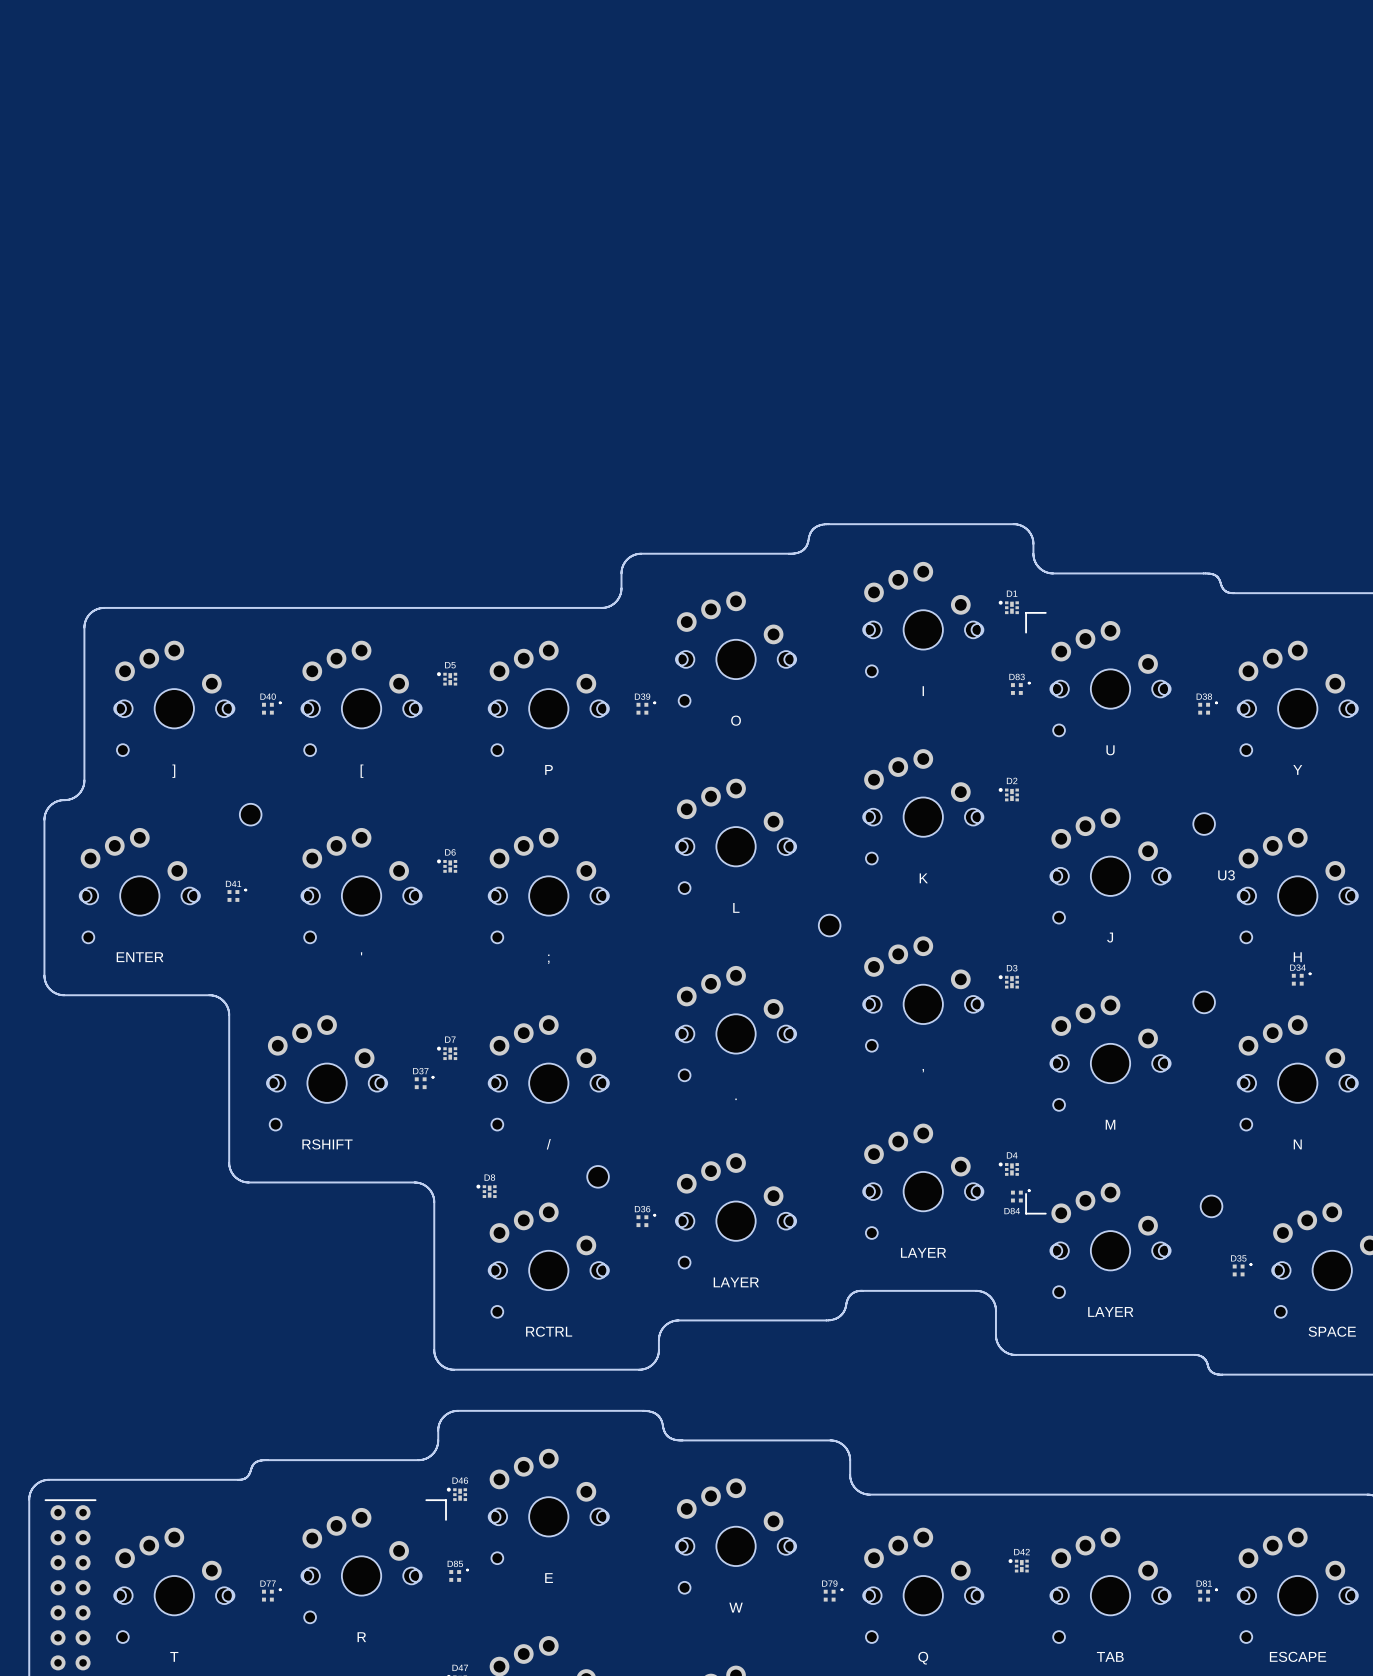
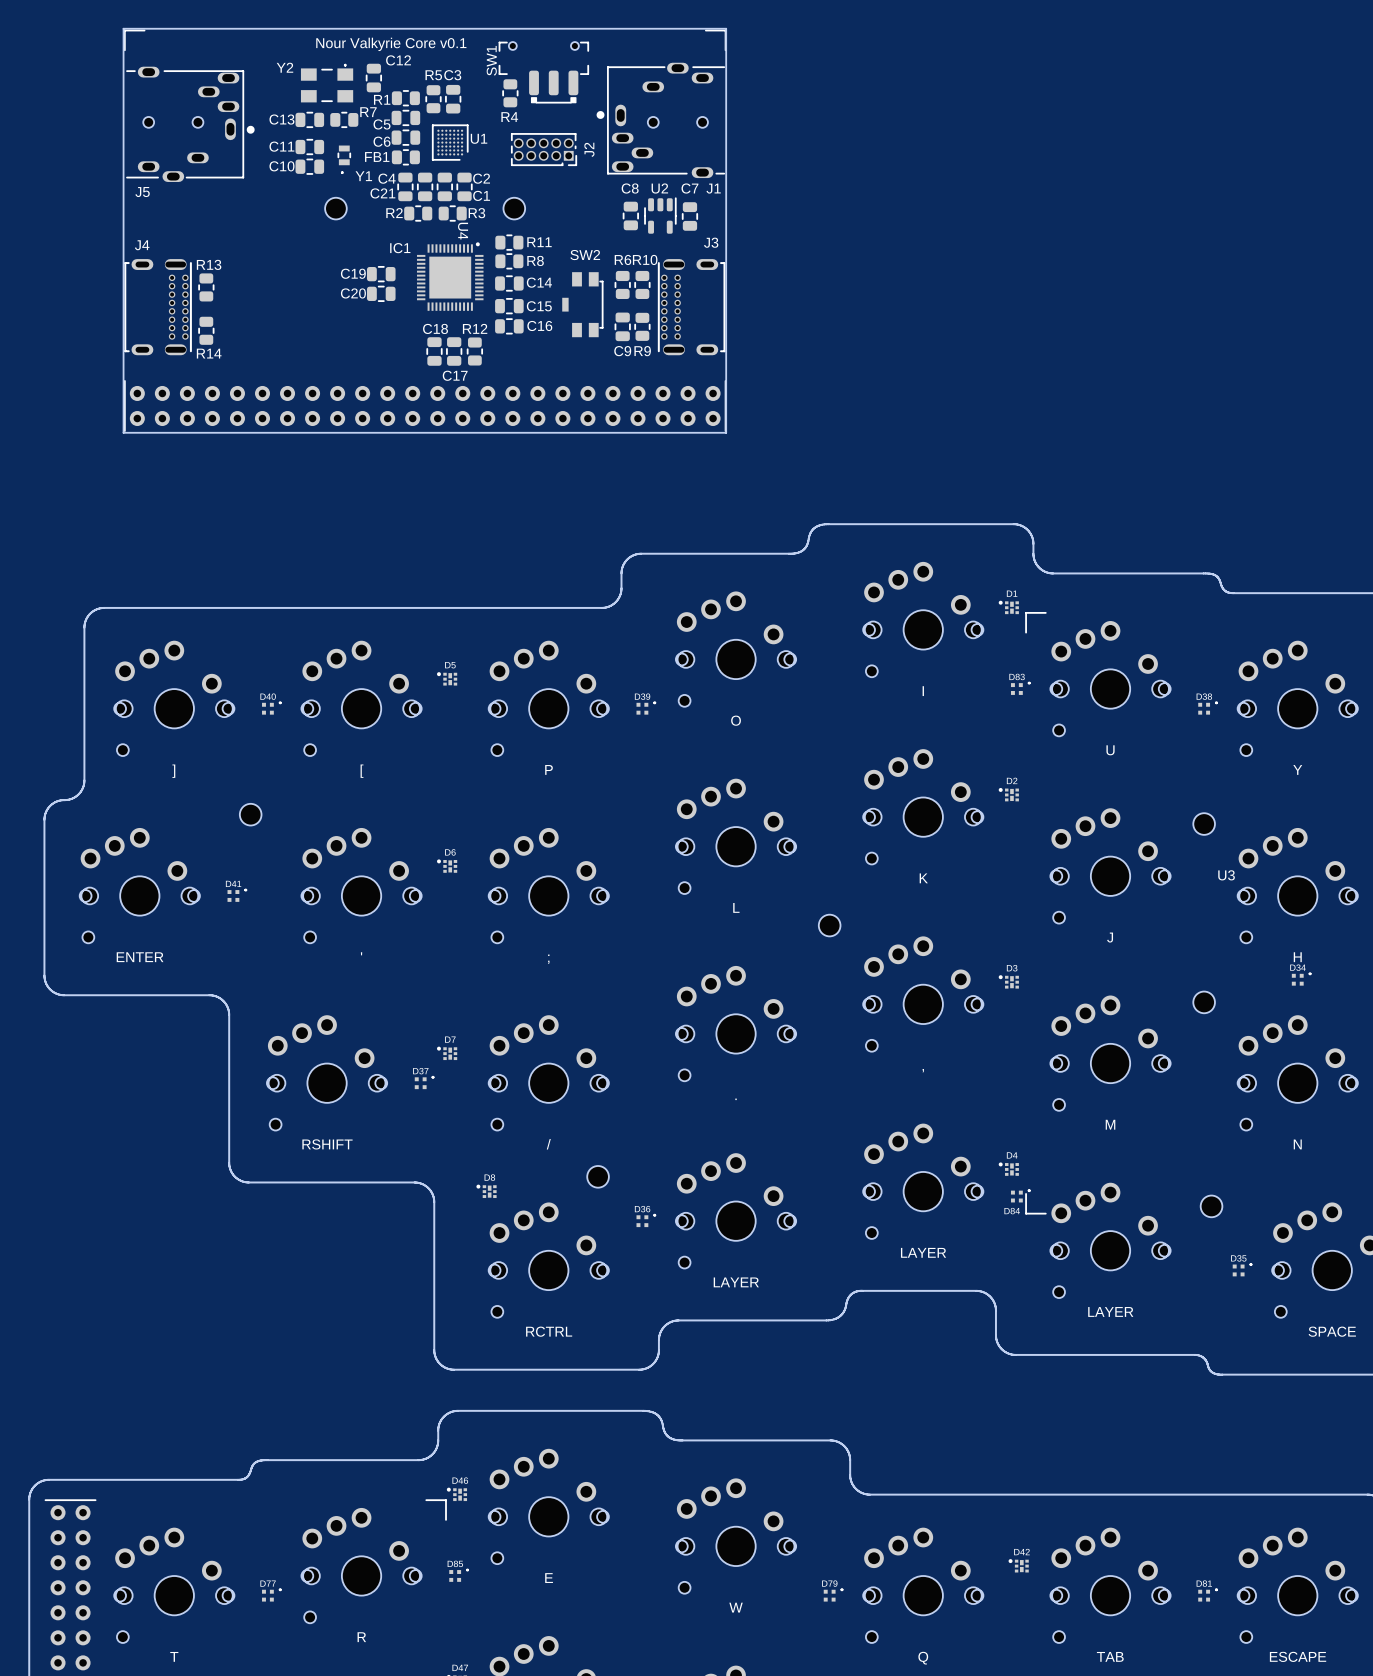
board edge: none -> (123, 28) (726, 28) (726, 432) (123, 432) (123, 28)
text: none -> Nour Valkyrie Core v0.1 (391, 44)
SW1: none -> (543, 72)
C12: none -> (373, 78)
Y2: none -> (327, 83)
R4: none -> (510, 93)
R1: none -> (405, 98)
R5: none -> (433, 99)
C3: none -> (453, 99)
C5: none -> (405, 117)
C13: none -> (309, 119)
R7: none -> (344, 119)
J1: none -> (660, 120)
J5: none -> (190, 124)
C6: none -> (405, 137)
U1: none -> (450, 142)
C11: none -> (309, 147)
J2: none -> (544, 149)
FB1: none -> (405, 157)
Y1: none -> (344, 159)
C10: none -> (309, 166)
C4: none -> (405, 186)
C21: none -> (425, 186)
C2: none -> (444, 186)
C1: none -> (464, 186)
part: none -> (335, 208)
part: none -> (514, 208)
R2: none -> (418, 213)
R3: none -> (452, 213)
C8: none -> (630, 215)
U2: none -> (660, 215)
C7: none -> (689, 216)
U4: none -> (425, 230)
R11: none -> (509, 242)
R8: none -> (509, 261)
C19: none -> (381, 274)
IC1: none -> (450, 276)
C14: none -> (509, 283)
R6: none -> (622, 284)
R10: none -> (642, 284)
R13: none -> (206, 287)
C20: none -> (381, 293)
SW2: none -> (582, 304)
C15: none -> (509, 306)
J4: none -> (158, 307)
J3: none -> (691, 307)
C16: none -> (509, 326)
C9: none -> (622, 326)
R9: none -> (642, 326)
R14: none -> (206, 330)
C18: none -> (434, 351)
C17: none -> (454, 351)
R12: none -> (474, 351)

